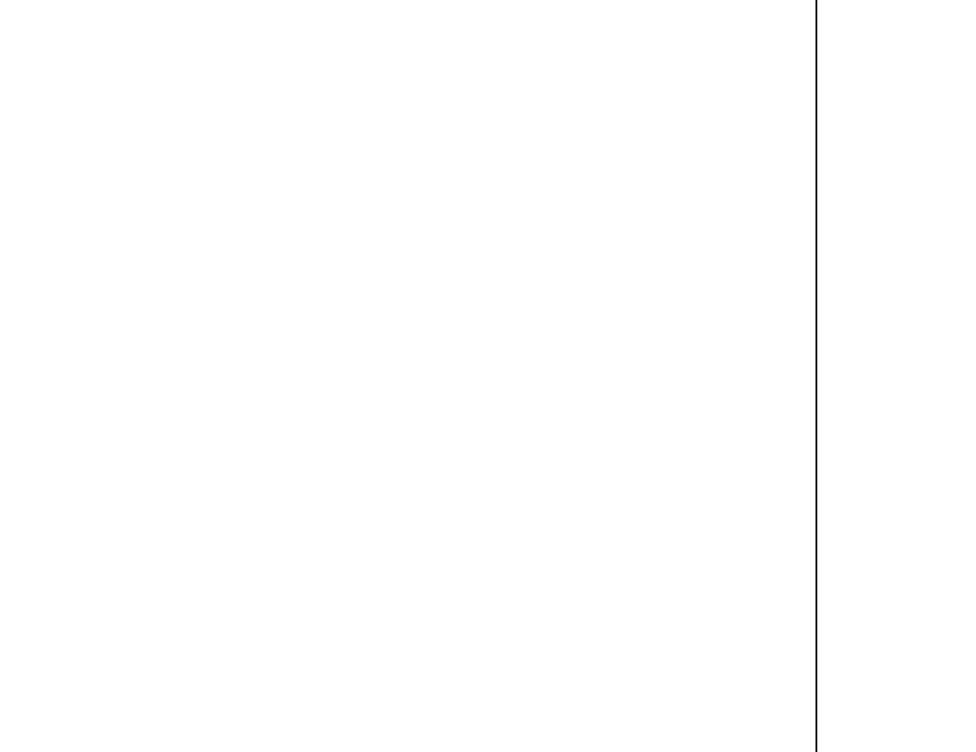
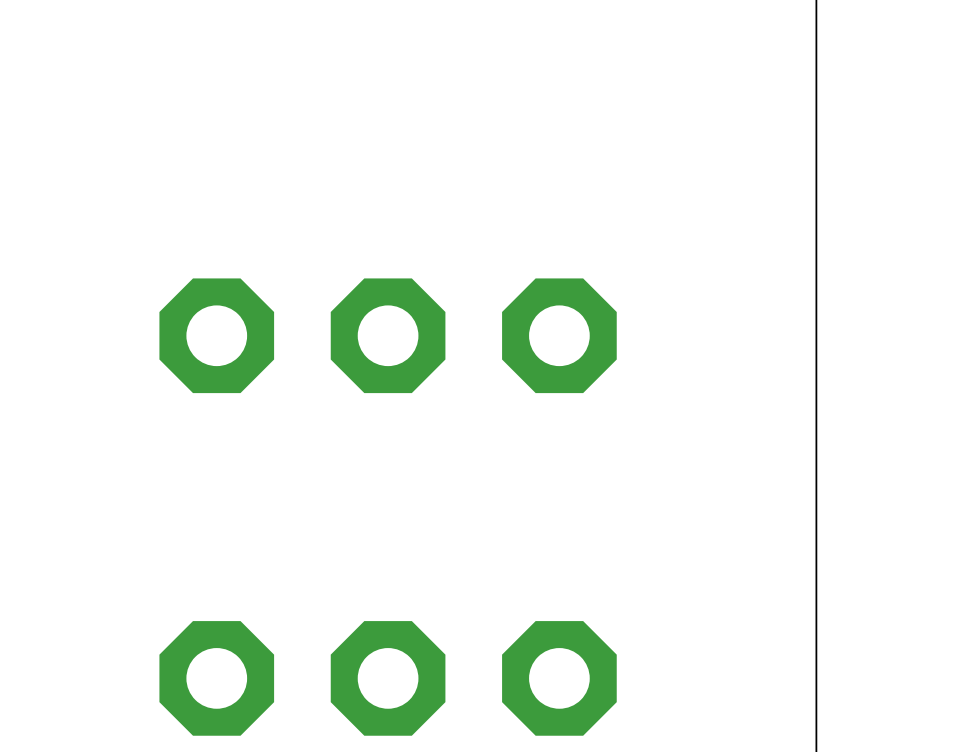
part: none -> (388, 335)
part: none -> (388, 678)

